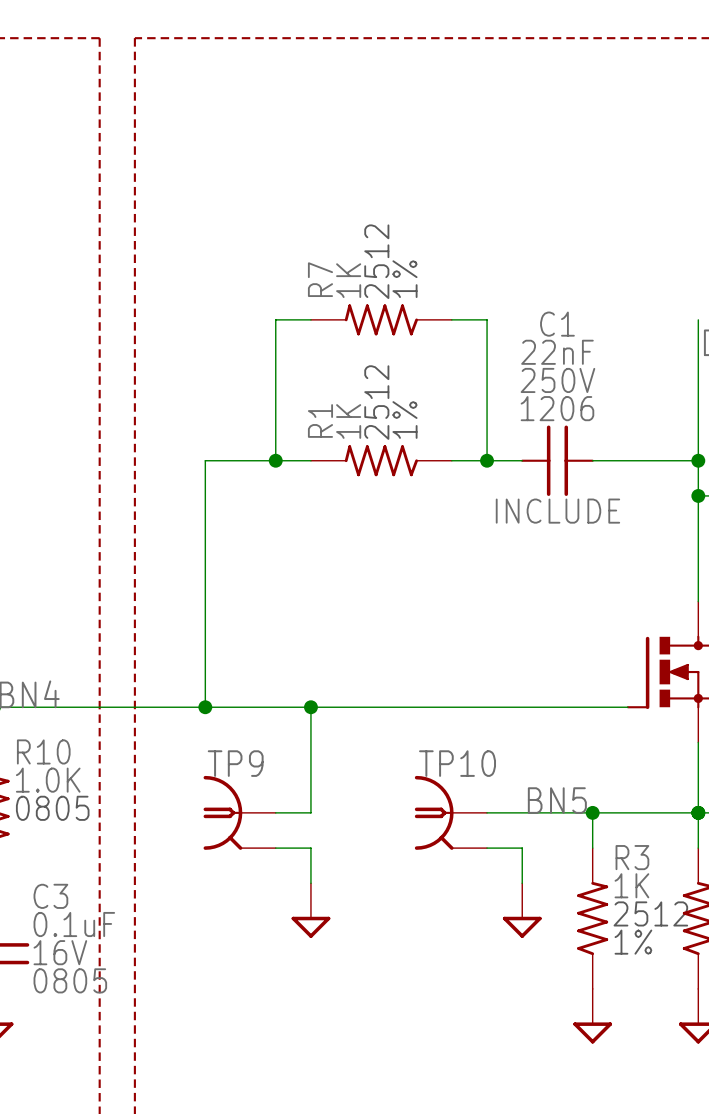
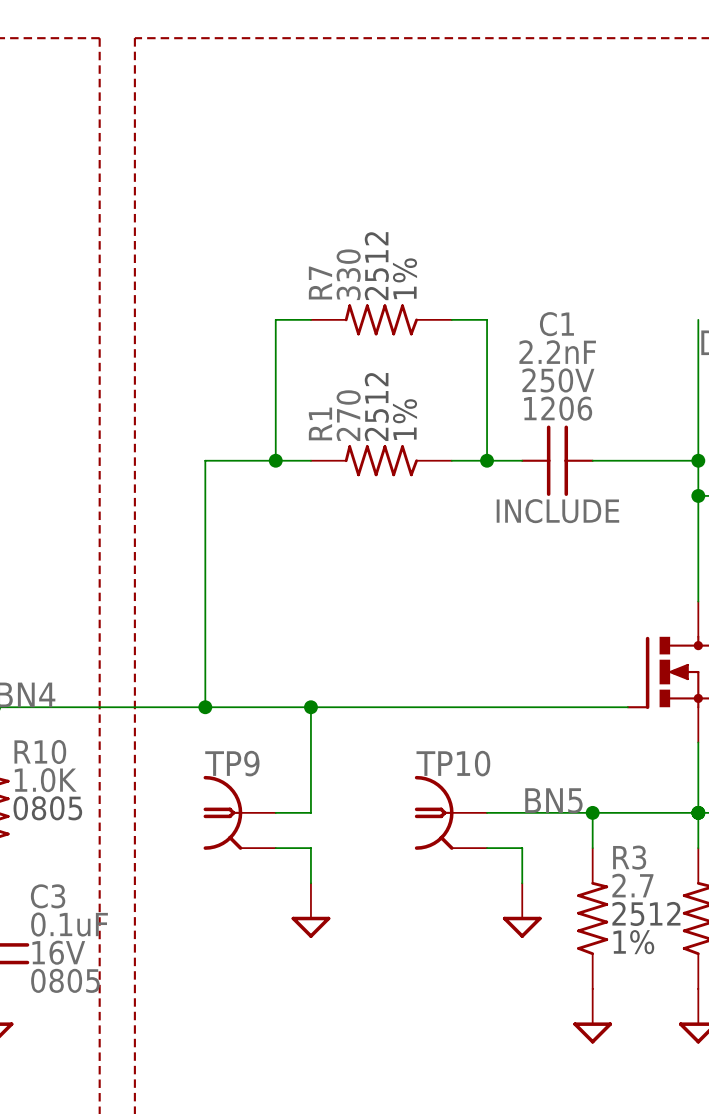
R7 value: 1K (348, 280) -> 330 (348, 274)
C1 value: 22nF (557, 352) -> 2.2nF (557, 352)
R1 value: 1K (348, 421) -> 270 (348, 415)
R3 value: 1K (631, 885) -> 2.7 (632, 885)

